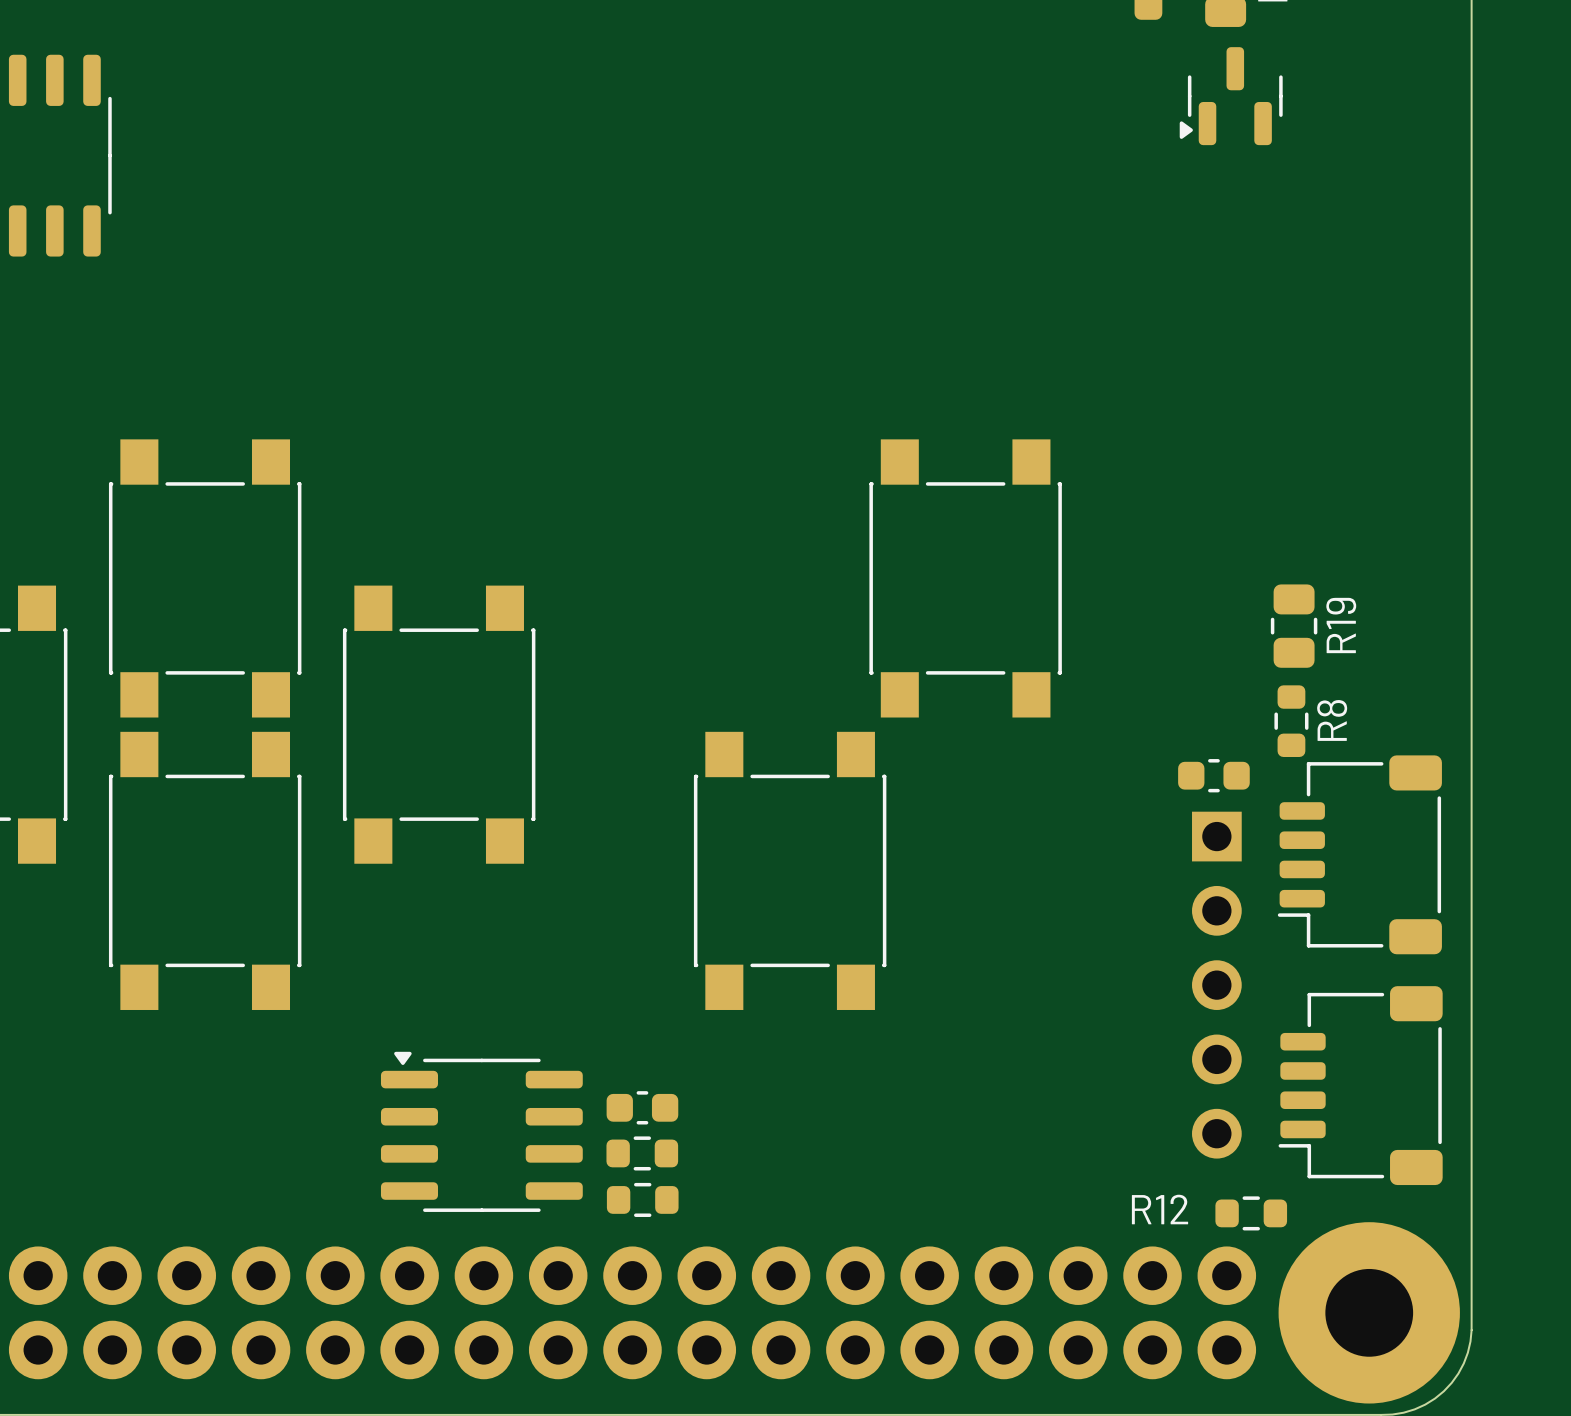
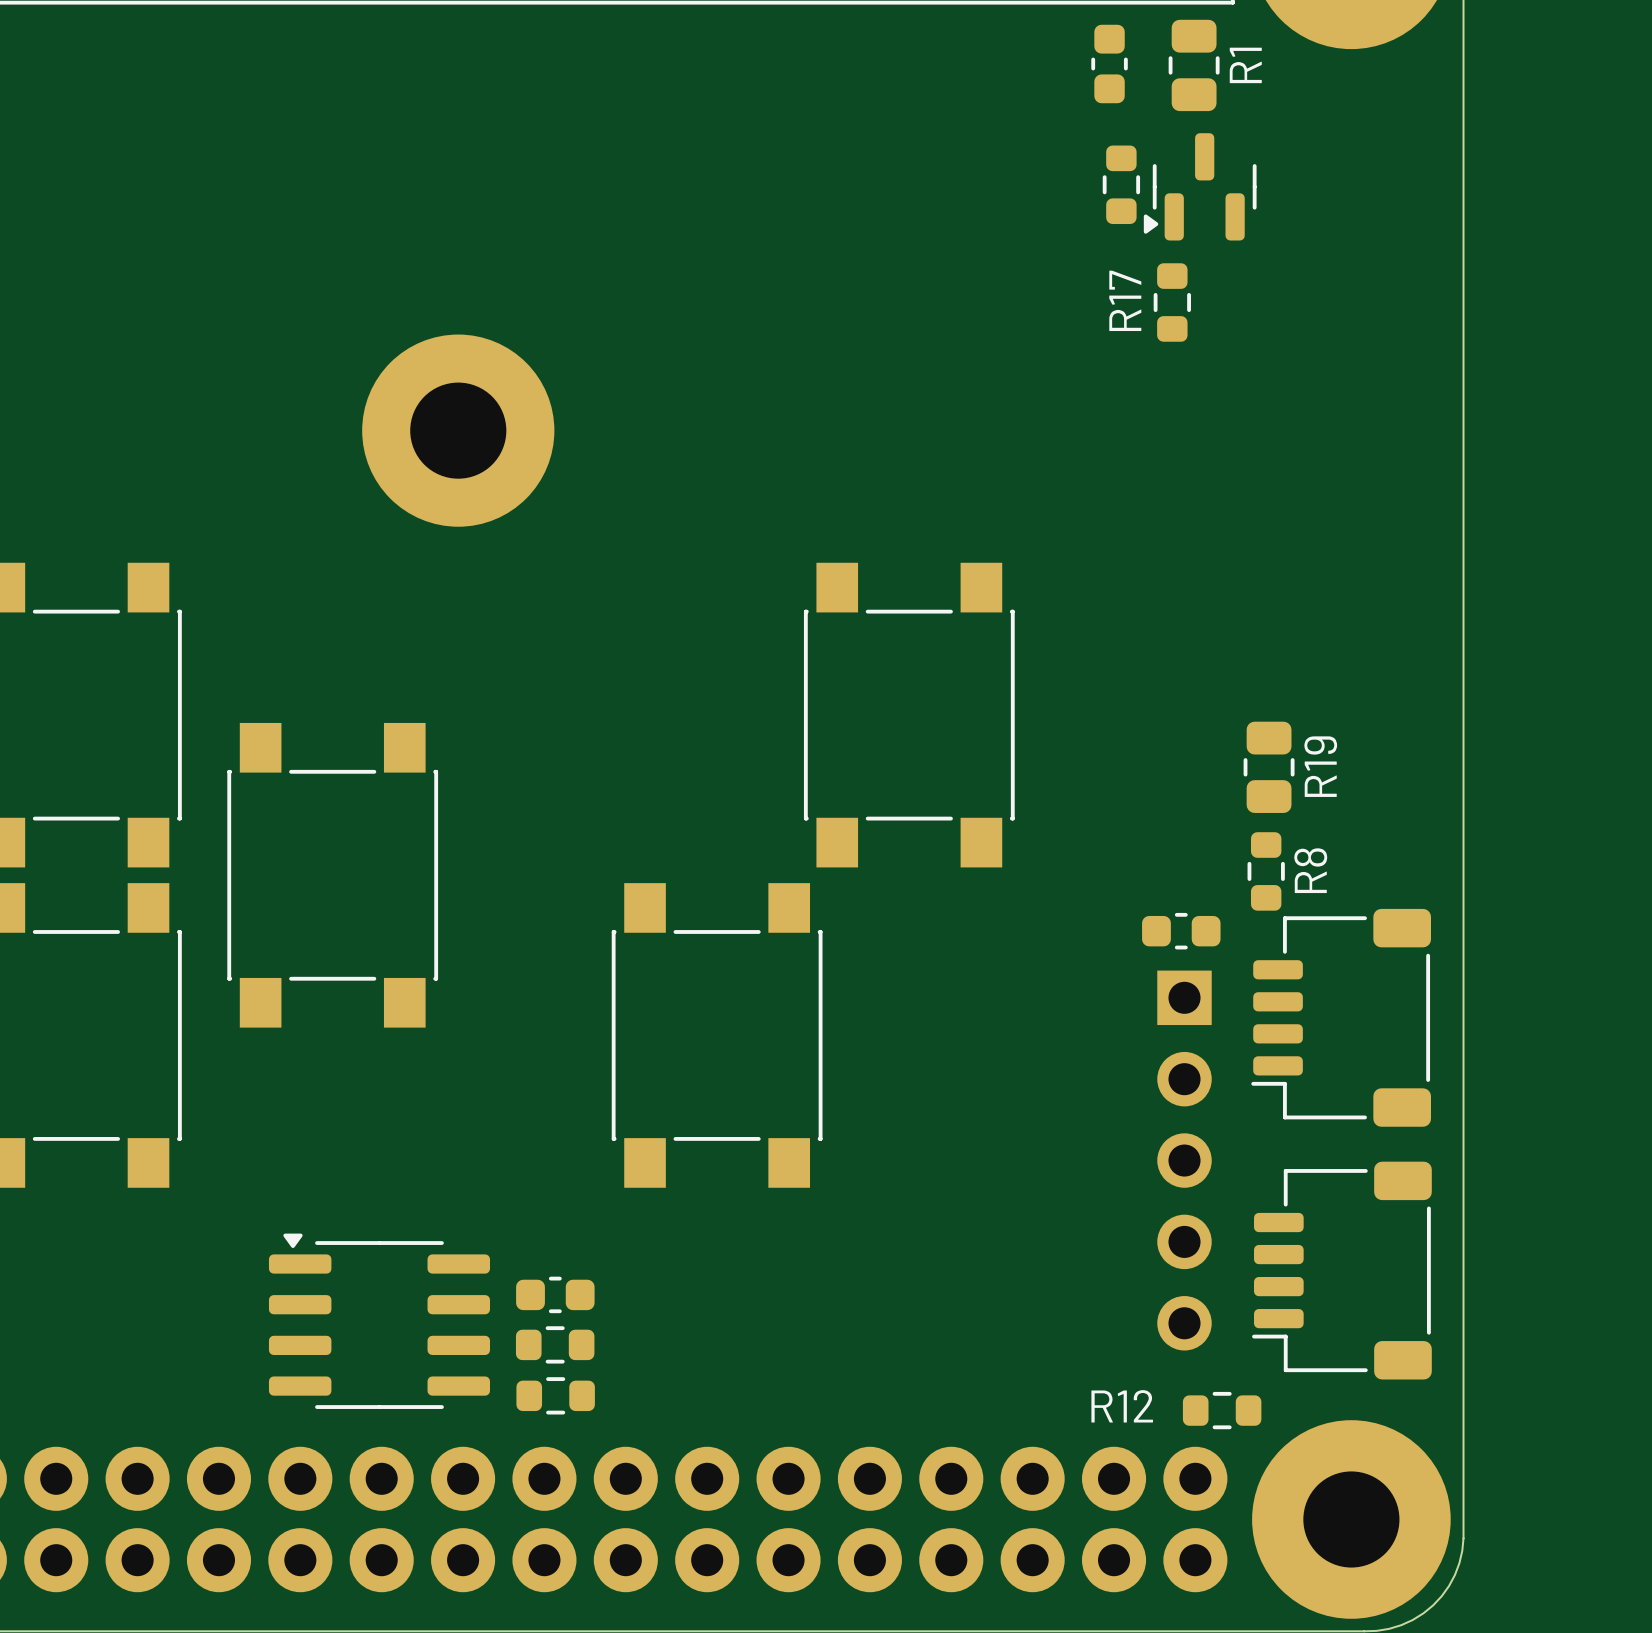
part: none -> (1121, 184)
R17: none -> (1172, 302)
part: none -> (458, 430)

